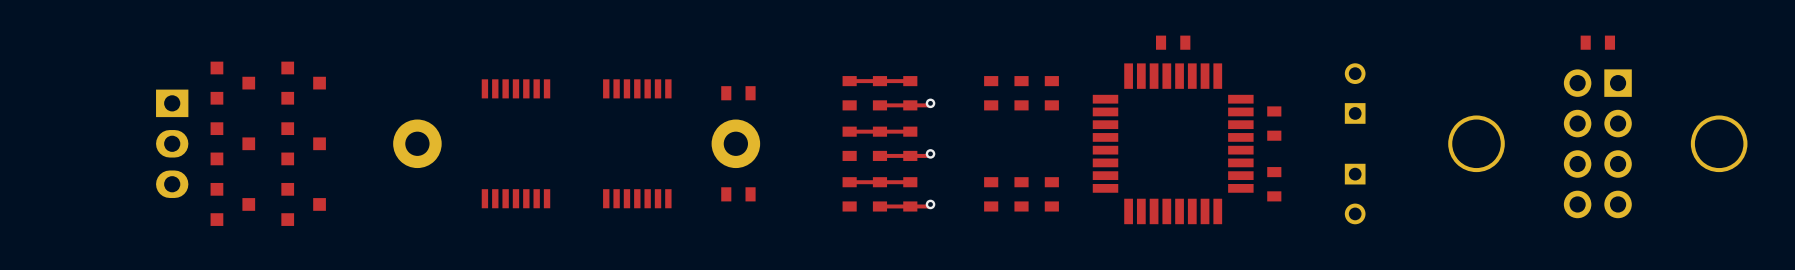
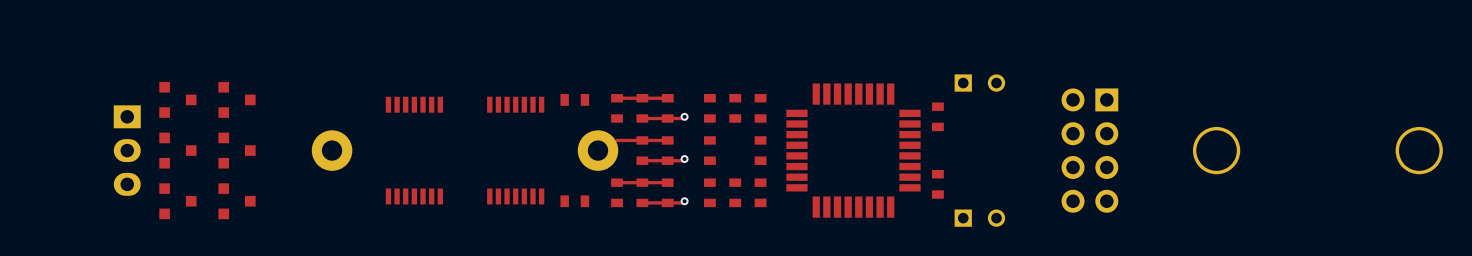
part: (1173, 42) -> none
part: (1597, 42) -> none
part: none -> (979, 83)
top track: (910, 81) (849, 81) -> (667, 98) (617, 98)
part: none -> (574, 99)
part: (738, 93) -> none
part: none -> (617, 108)
part: none -> (642, 108)
part: none -> (667, 108)
part: (849, 93) -> none
part: none -> (709, 108)
part: (879, 93) -> none
part: none -> (735, 108)
part: (910, 93) -> none
part: none -> (760, 108)
part: (991, 93) -> none
part: (1021, 93) -> none
part: (1051, 93) -> none
part: (1355, 93) -> none
via: none -> (684, 116)
top track: (930, 103) (928, 105) (879, 105) -> (684, 116) (682, 118) (642, 118)
via: (930, 103) -> none
part: none -> (937, 116)
part: (1274, 123) -> none
top track: (910, 131) (849, 131) -> (667, 140) (617, 140)
part: none -> (642, 150)
part: none -> (667, 150)
part: (849, 143) -> none
part: none -> (709, 150)
part: (879, 143) -> none
part: (910, 143) -> none
part: none -> (760, 150)
part position: (1173, 143) -> (853, 150)
part position: (1597, 143) -> (1089, 150)
via: none -> (684, 159)
top track: (930, 153) (928, 155) (879, 155) -> (684, 159) (682, 160) (642, 160)
via: (930, 153) -> none
top track: (910, 182) (849, 182) -> (667, 182) (617, 182)
part: none -> (937, 184)
part: (1274, 184) -> none
part: (738, 194) -> none
part: none -> (617, 192)
part: none -> (642, 192)
part: none -> (667, 192)
part: (849, 194) -> none
part: none -> (709, 192)
part: (879, 194) -> none
part: none -> (735, 192)
part: (910, 194) -> none
part: none -> (760, 192)
part: (991, 194) -> none
part: (1021, 194) -> none
part: (1051, 194) -> none
part: (1355, 194) -> none
part: none -> (574, 201)
via: none -> (684, 201)
top track: (930, 204) (928, 206) (879, 206) -> (684, 201) (682, 202) (642, 202)
via: (930, 204) -> none
part: none -> (979, 218)

